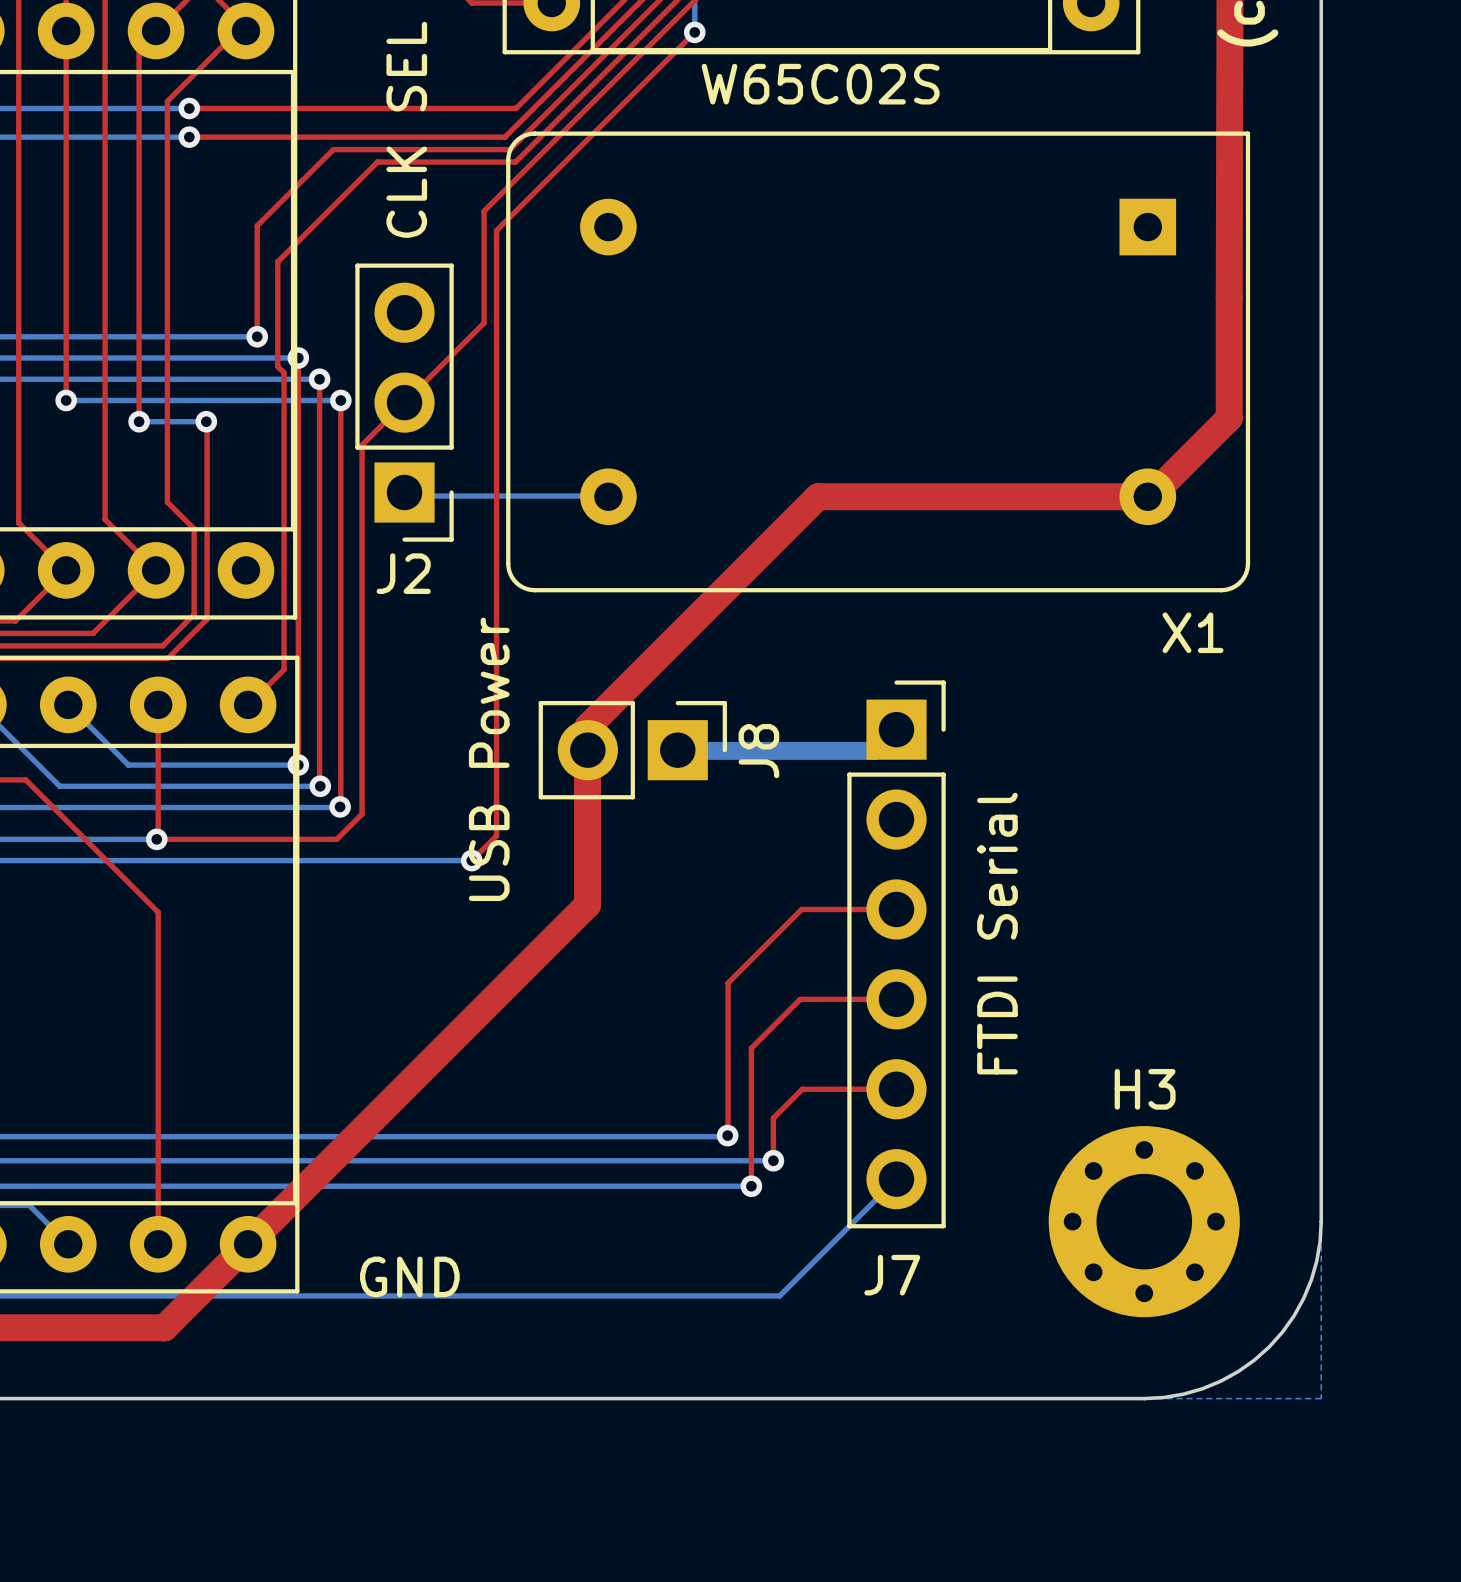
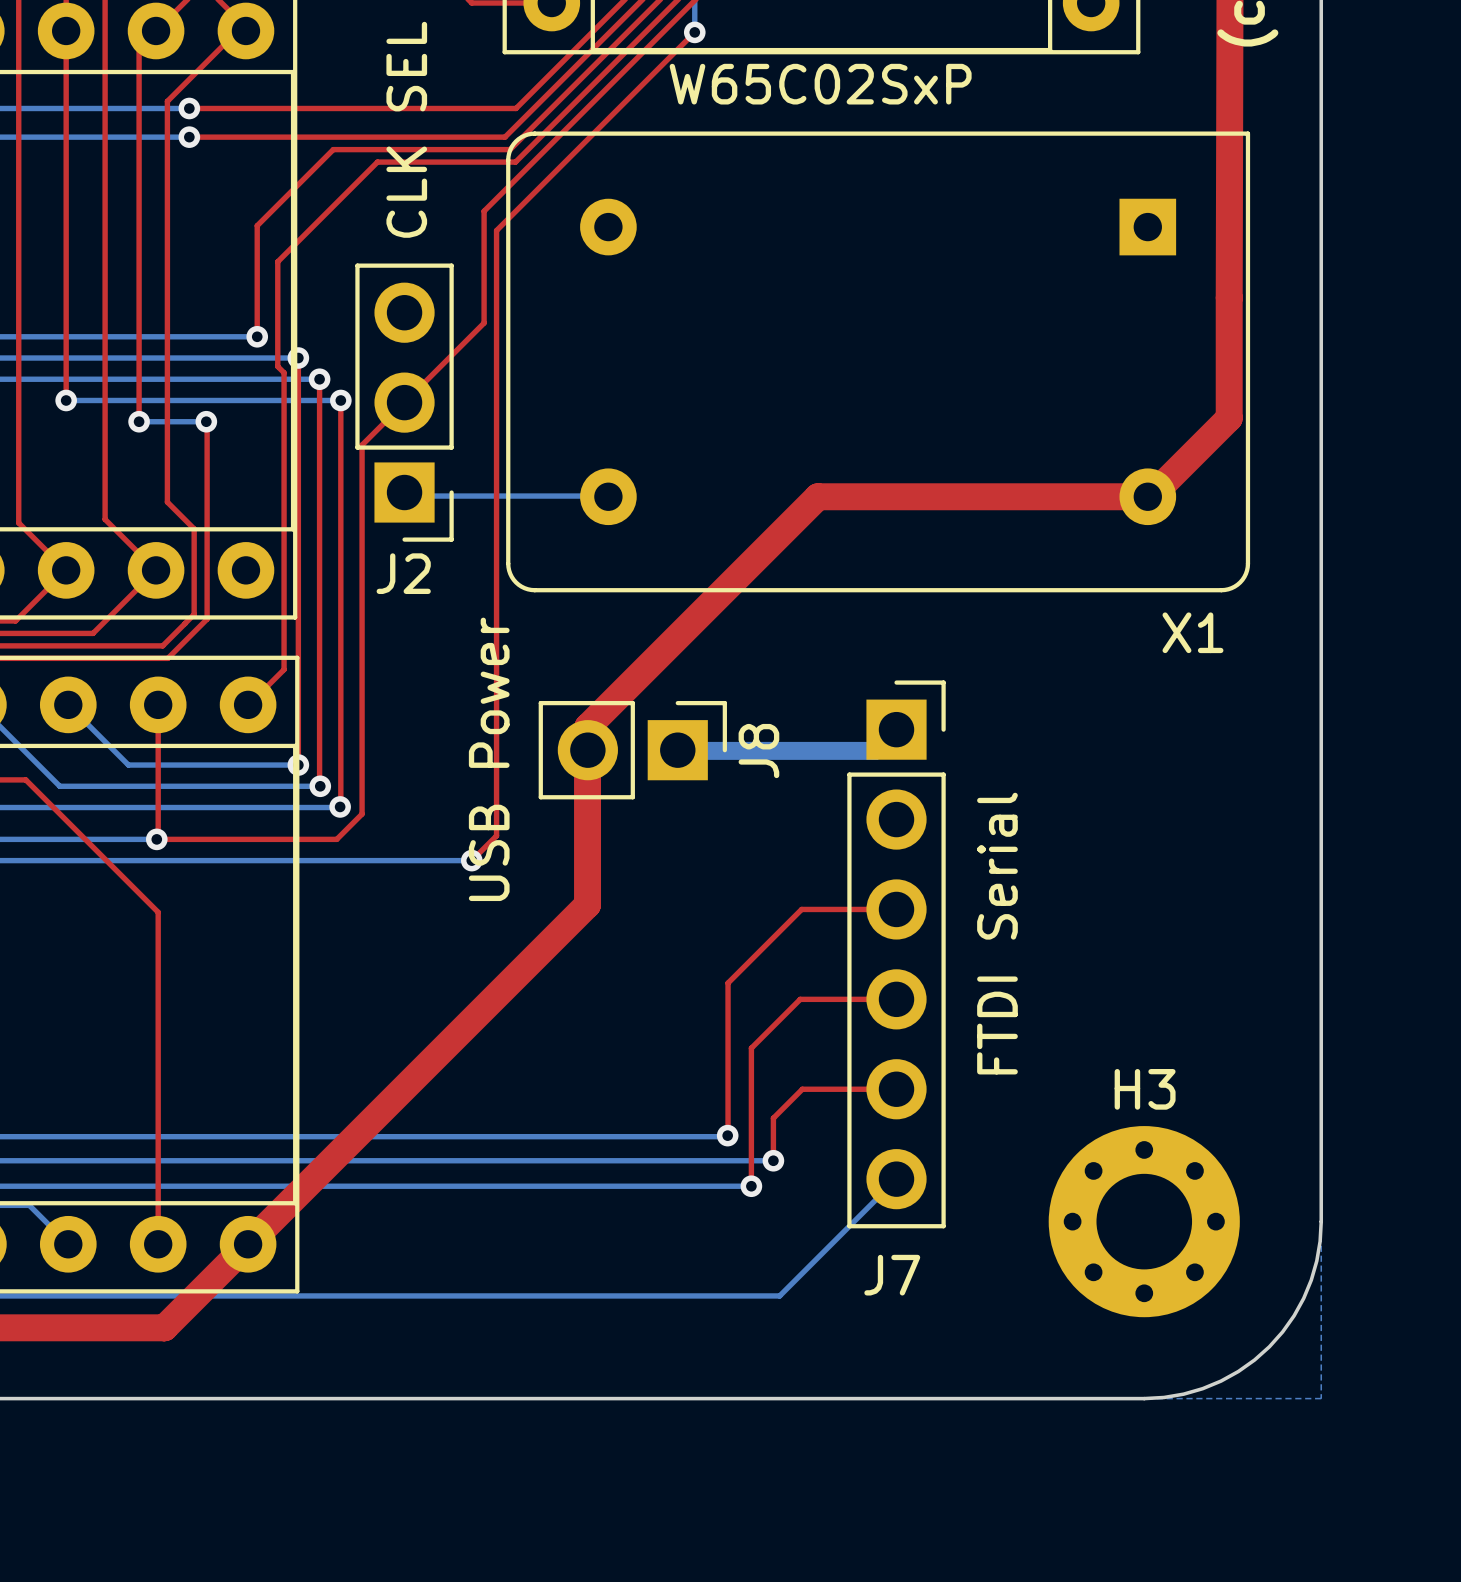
part value: W65C02S (820, 84) -> W65C02SxP (820, 84)
text: GND (409, 1276) -> none

